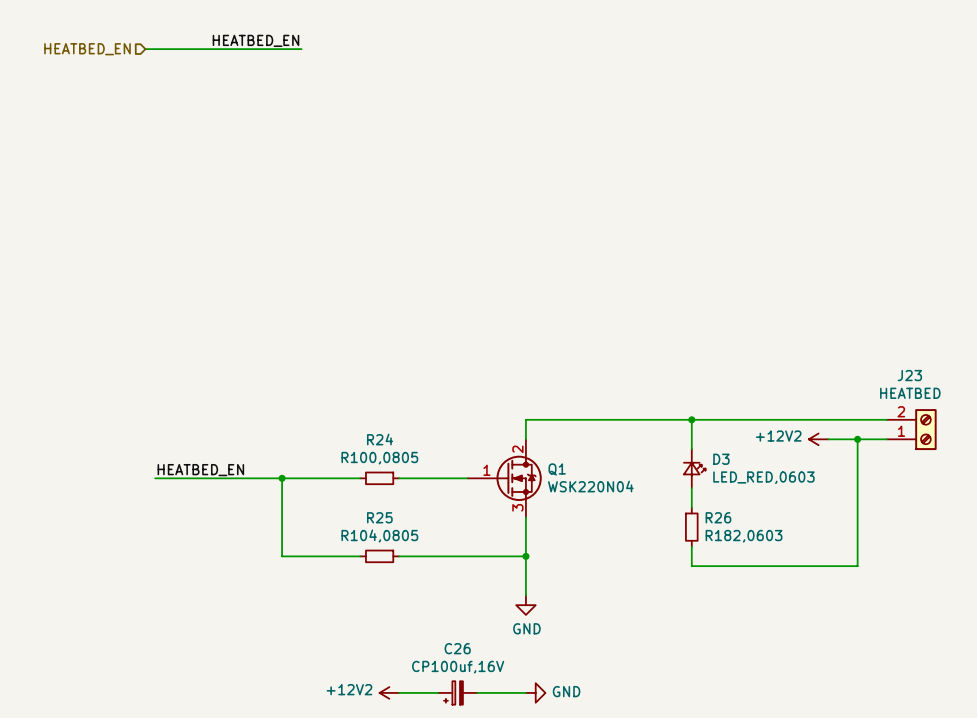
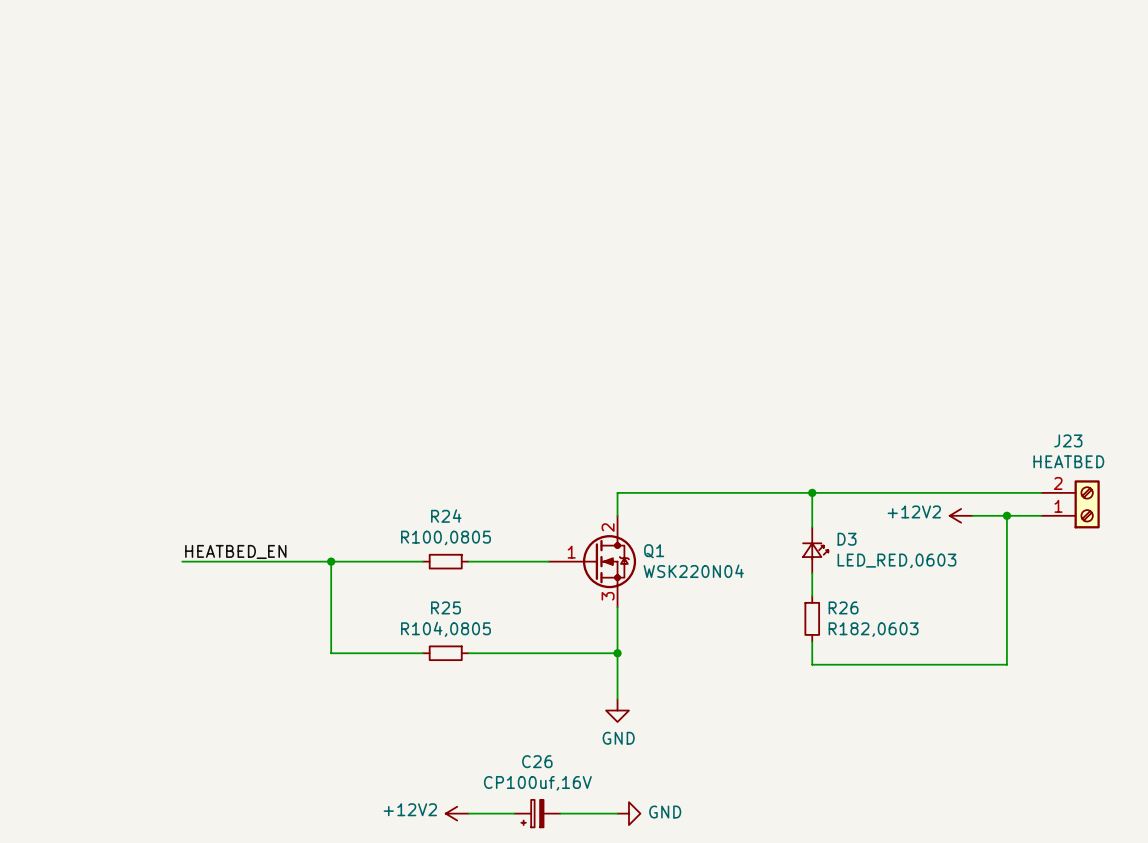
label: HEATBED_EN (255, 40) -> none
hierarchical label: HEATBED_EN (87, 49) -> none
wire: (145, 49) (301, 49) -> none

